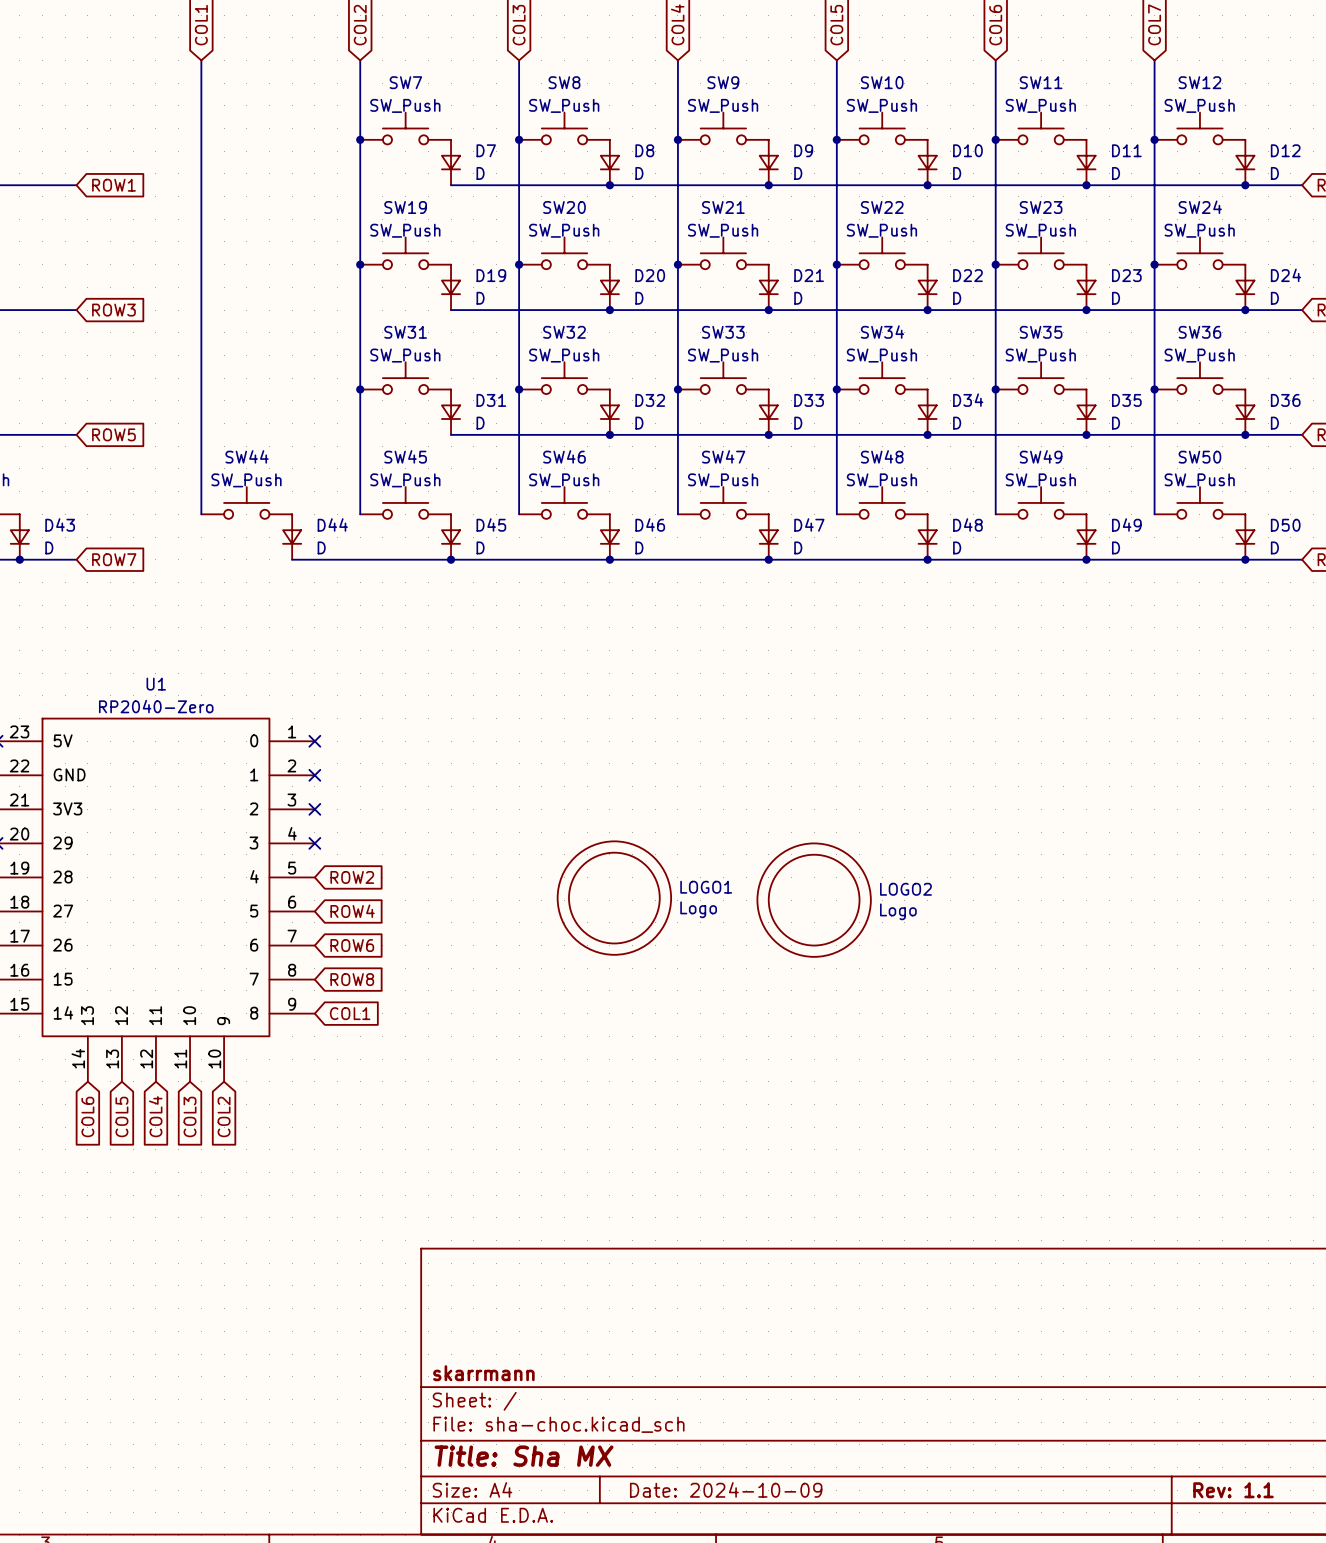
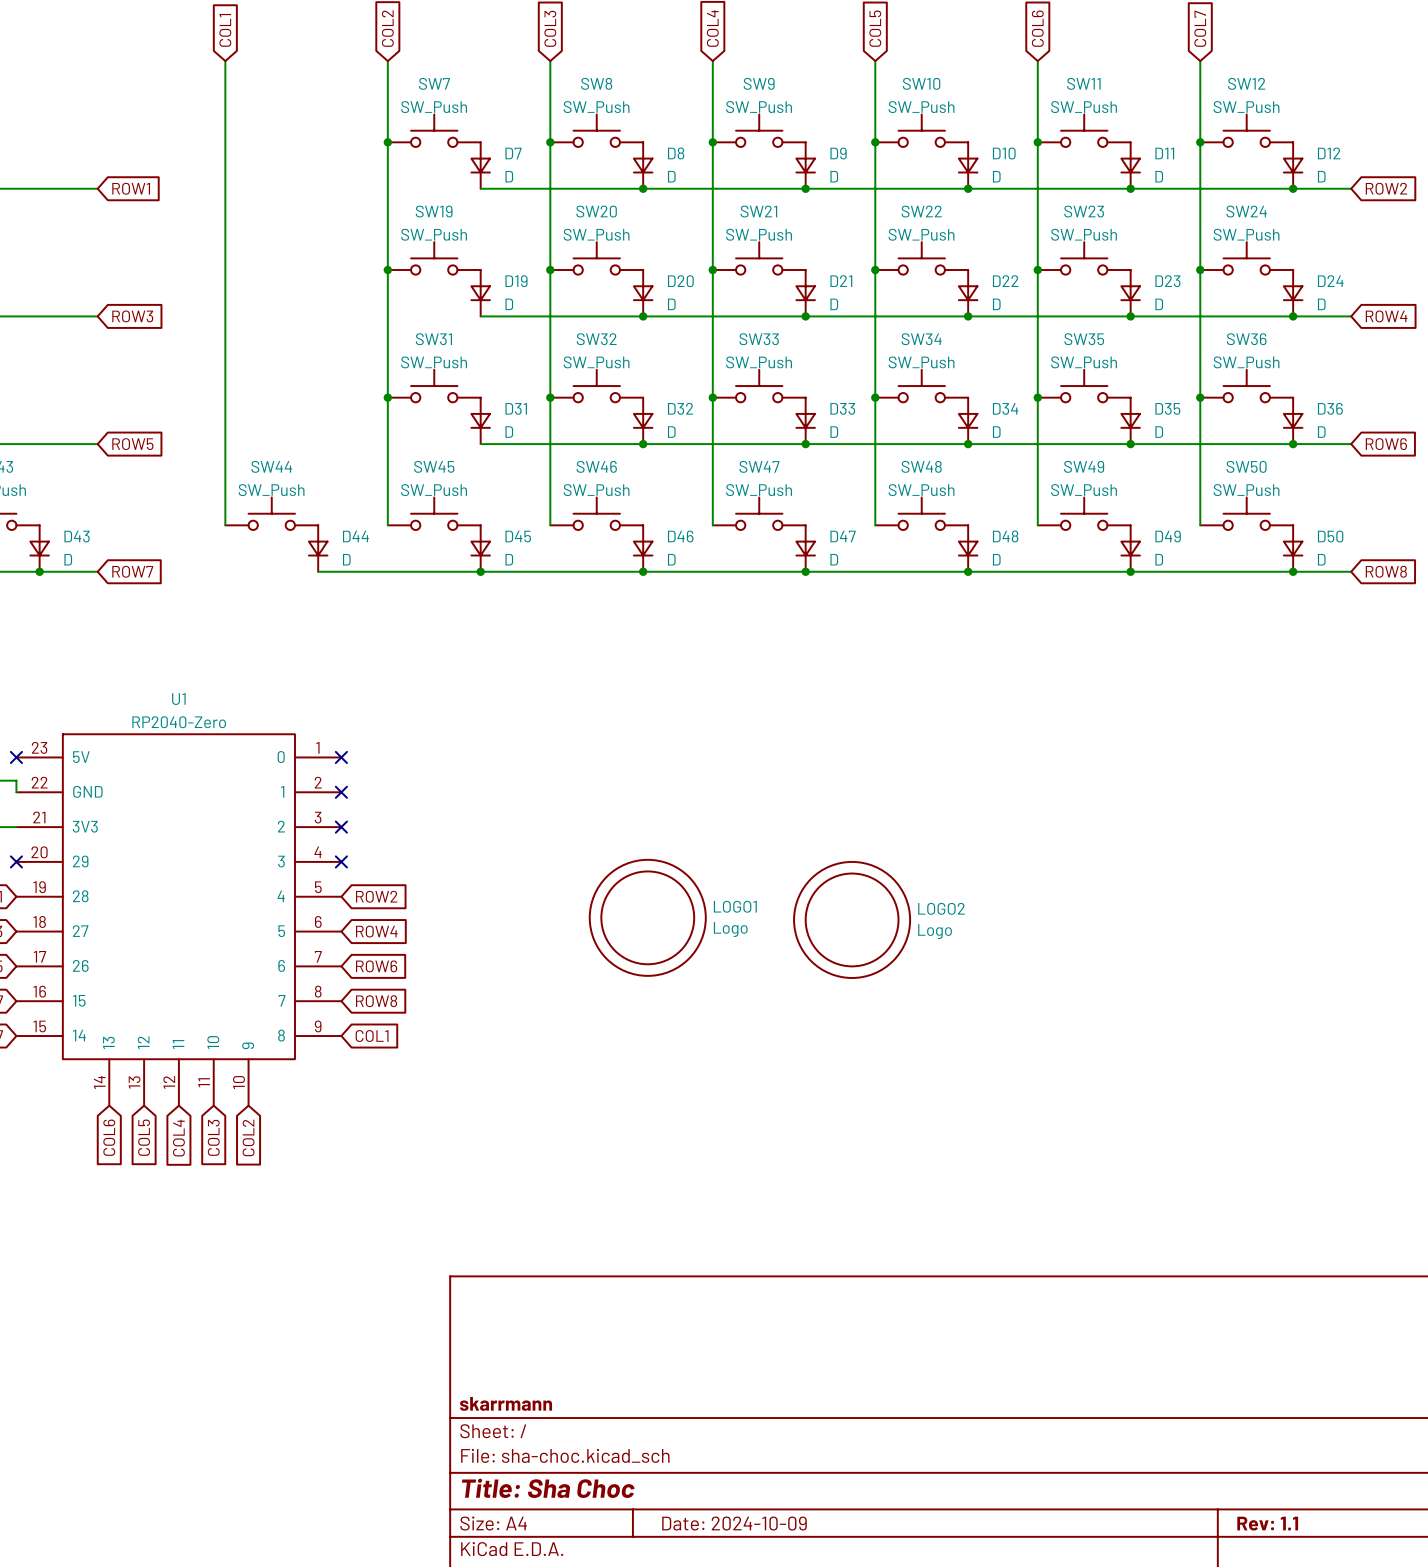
title block: Title: Sha MX (524, 1456) -> Title: Sha Choc (548, 1488)

